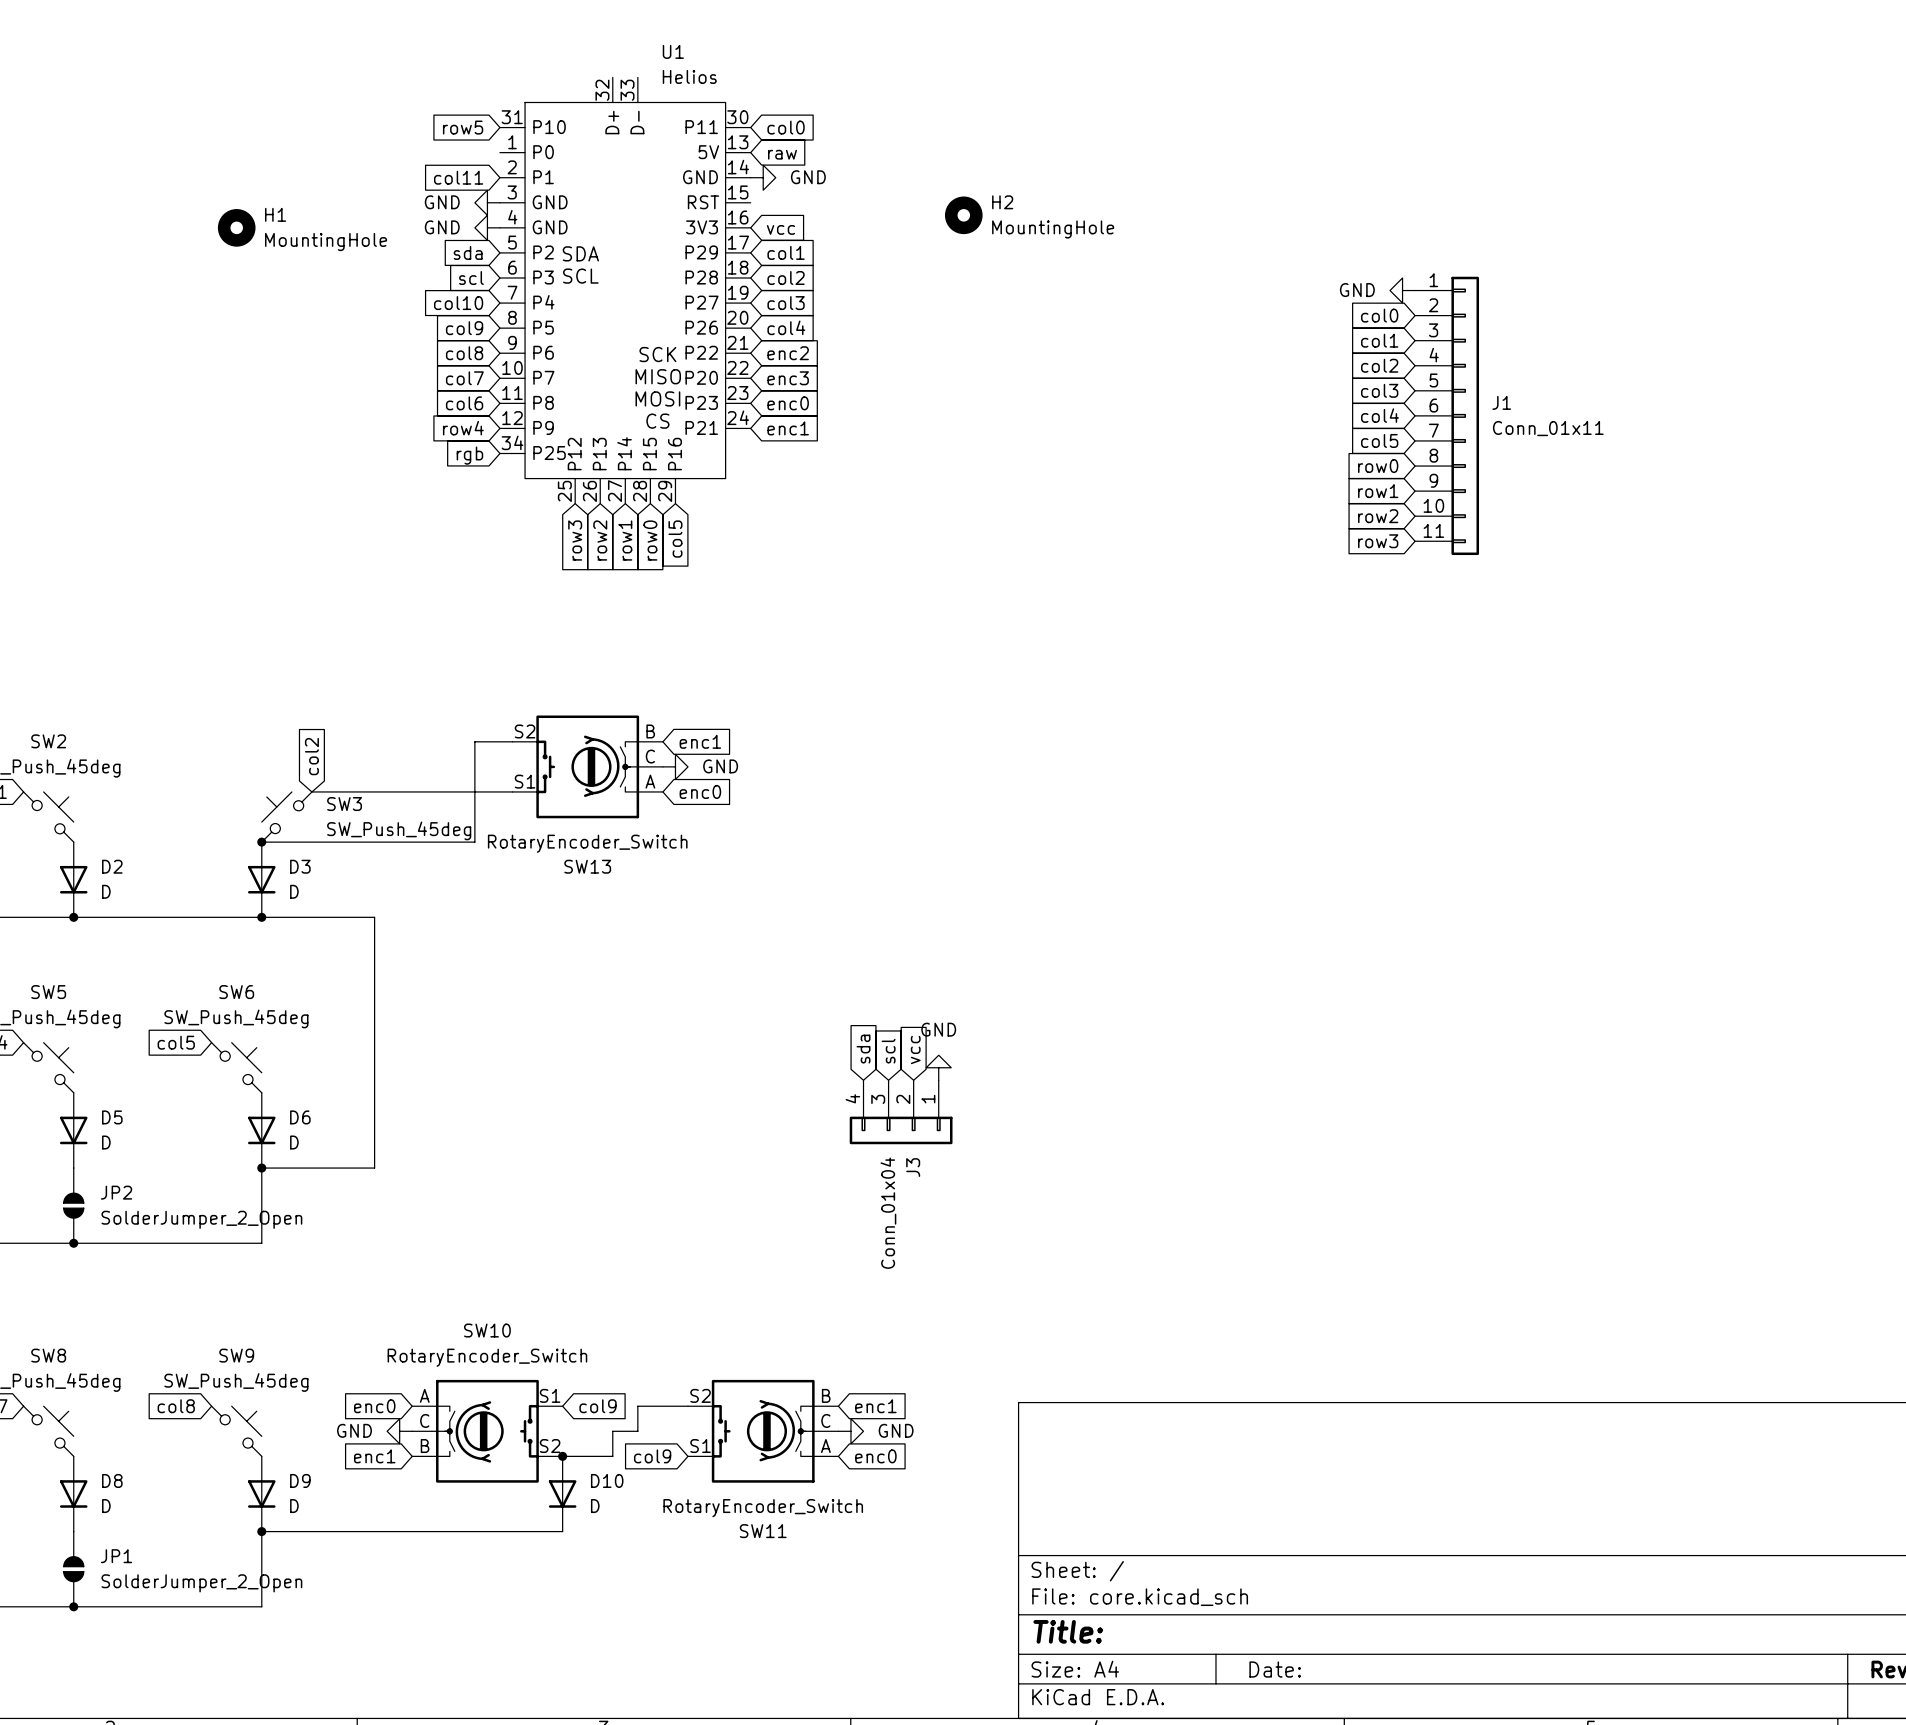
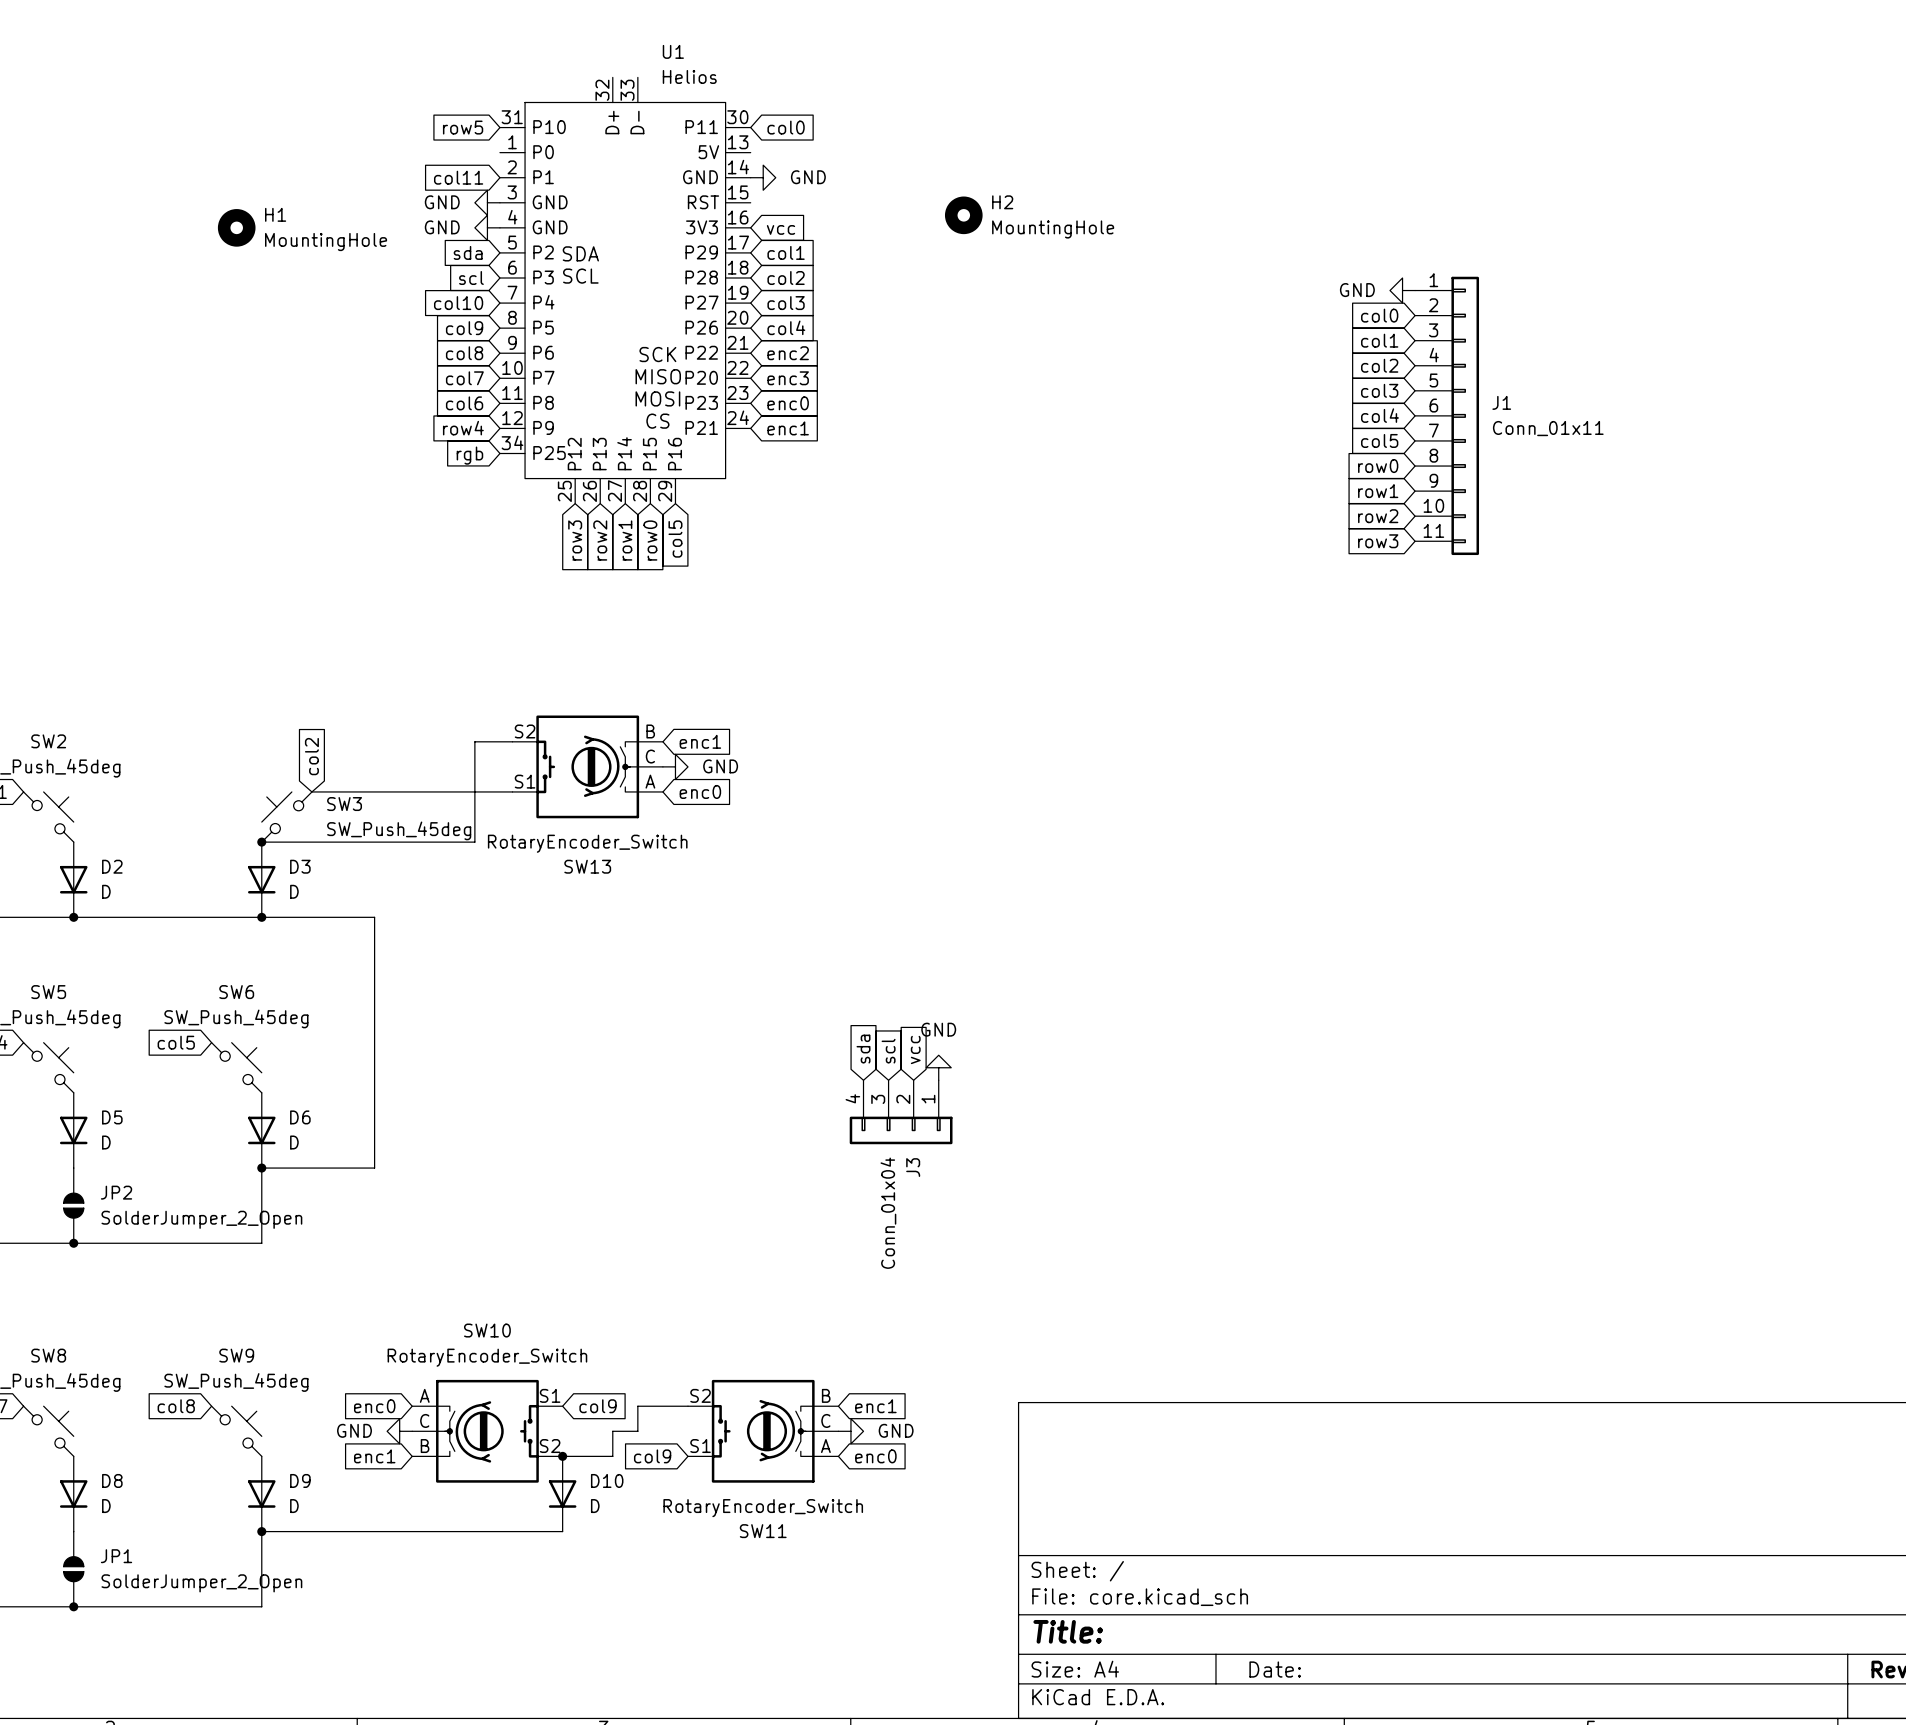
global label: raw (782, 154) -> none

